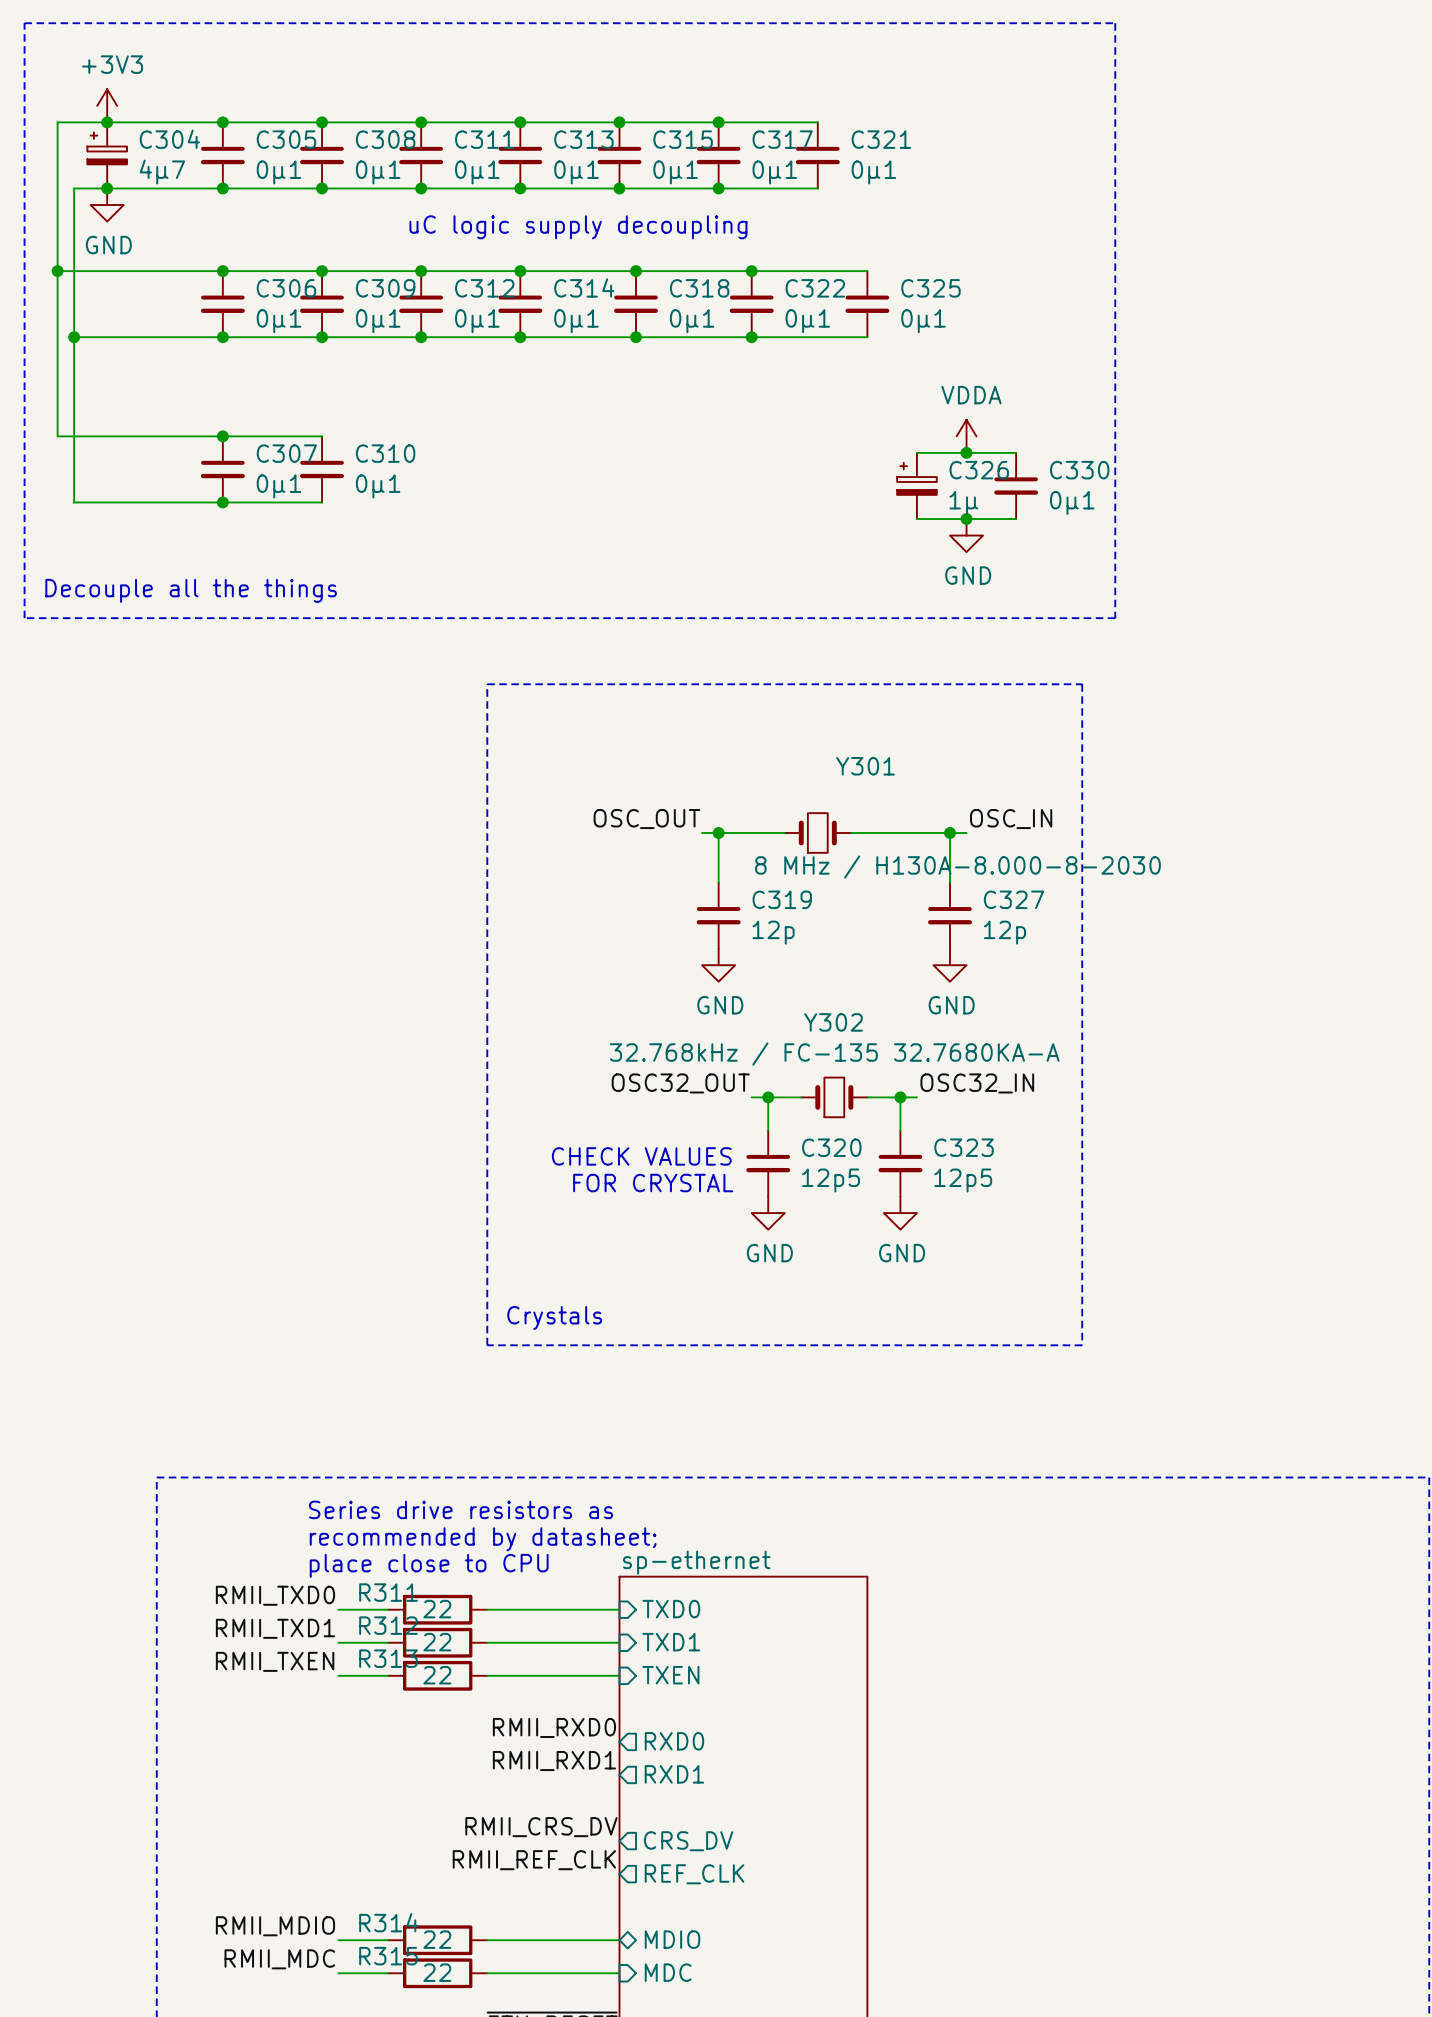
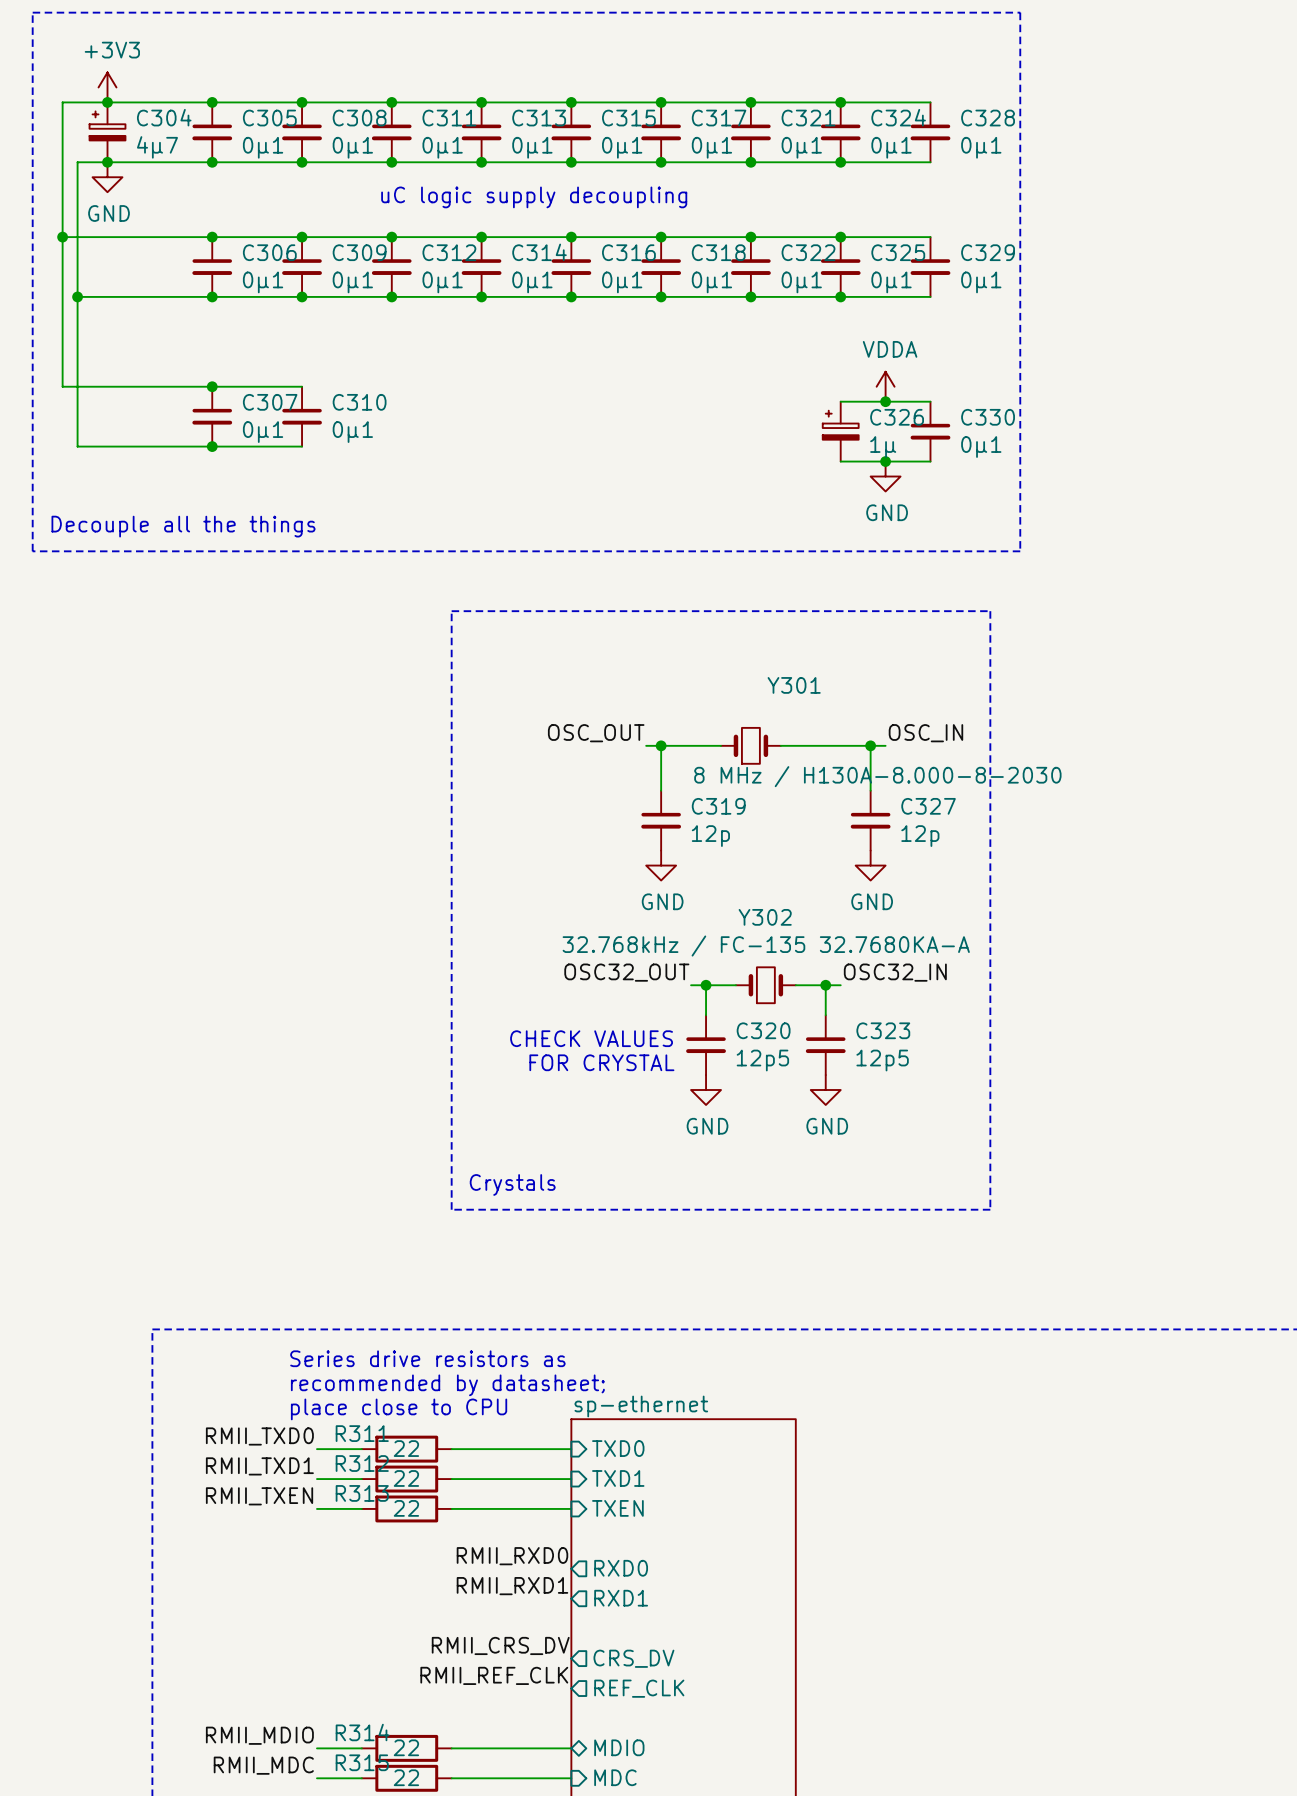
wire: none -> (750, 102) (930, 102)
junction: none -> (750, 102)
junction: none -> (840, 102)
C324: none -> 0µ1 (840, 132)
C328: none -> 0µ1 (930, 132)
wire: none -> (750, 162) (930, 162)
junction: none -> (750, 162)
junction: none -> (840, 162)
junction position: (636, 271) -> (571, 237)
junction: none -> (661, 237)
junction: (751, 271) -> none
junction: none -> (750, 237)
wire: none -> (795, 237) (930, 237)
junction: none -> (840, 237)
C316: none -> 0µ1 (571, 267)
C318 position: (636, 304) -> (661, 267)
C322 position: (751, 304) -> (750, 267)
C325 position: (867, 304) -> (840, 267)
C329: none -> 0µ1 (930, 267)
junction position: (636, 337) -> (571, 296)
junction: none -> (661, 296)
junction: (751, 337) -> none
junction: none -> (750, 296)
wire: none -> (795, 296) (930, 296)
junction: none -> (840, 296)

